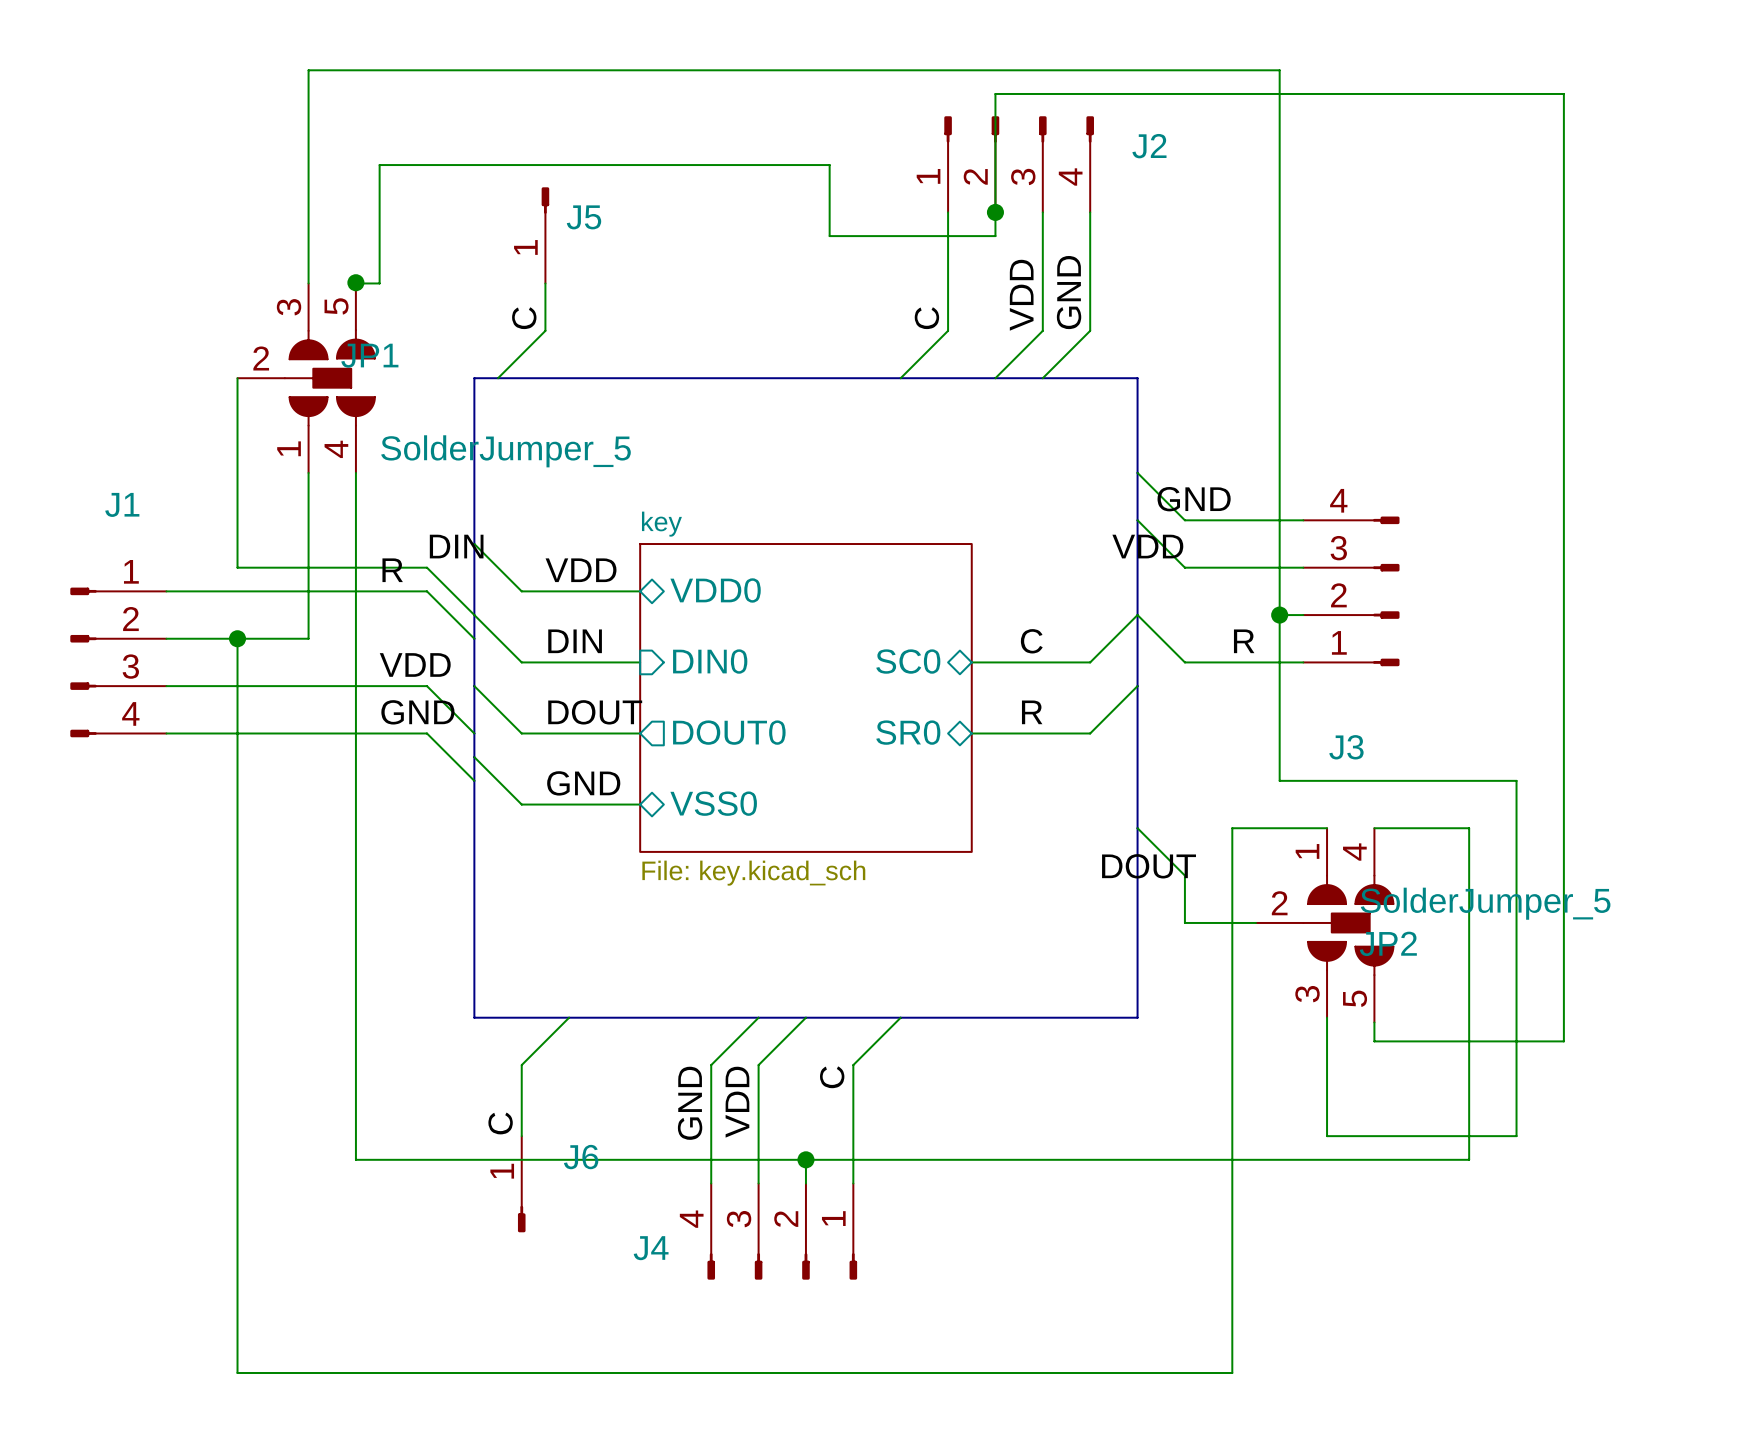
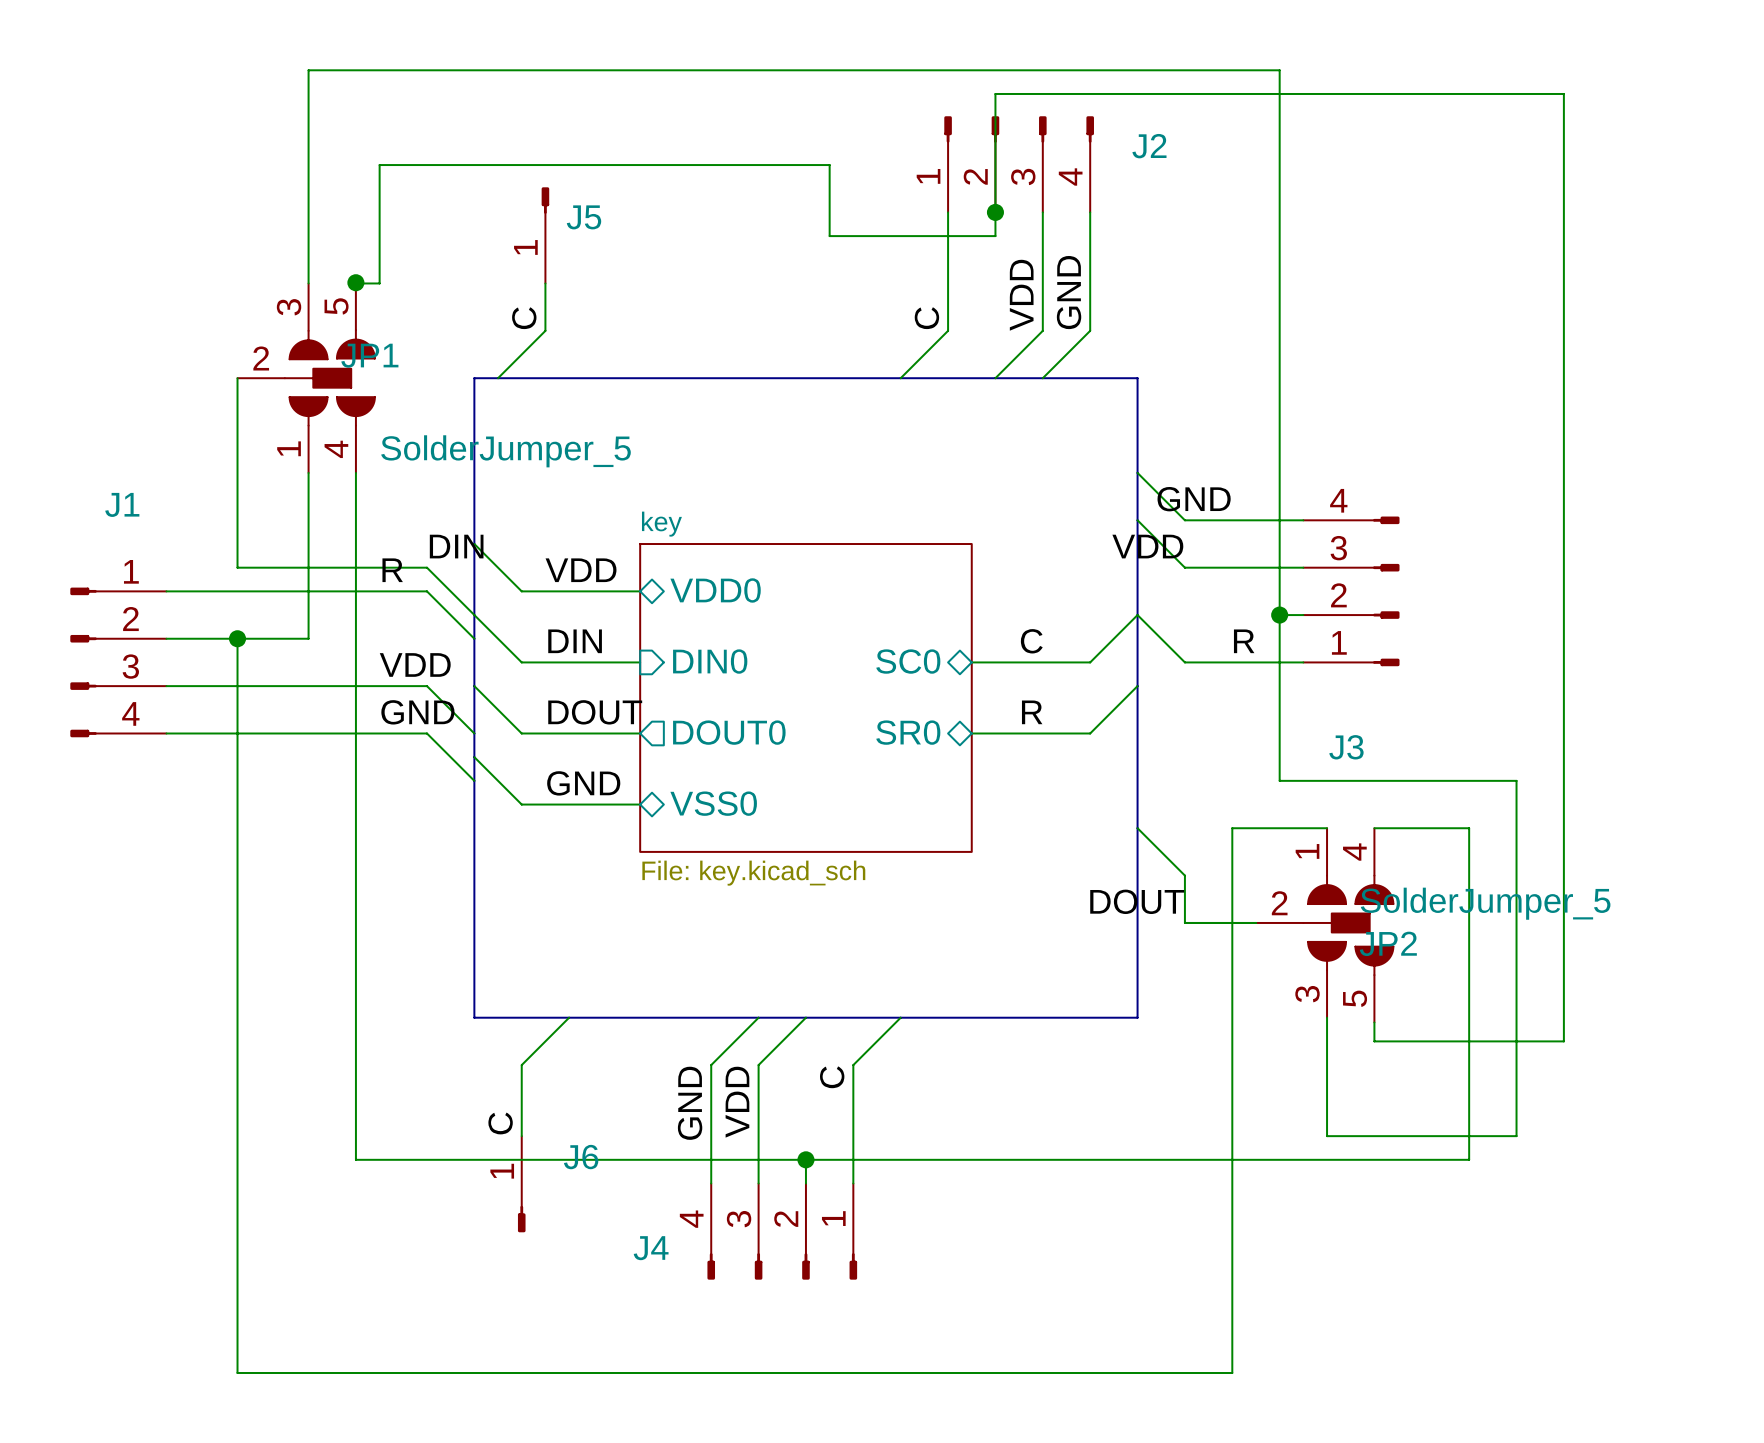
label position: DOUT (1149, 866) -> DOUT (1137, 901)

